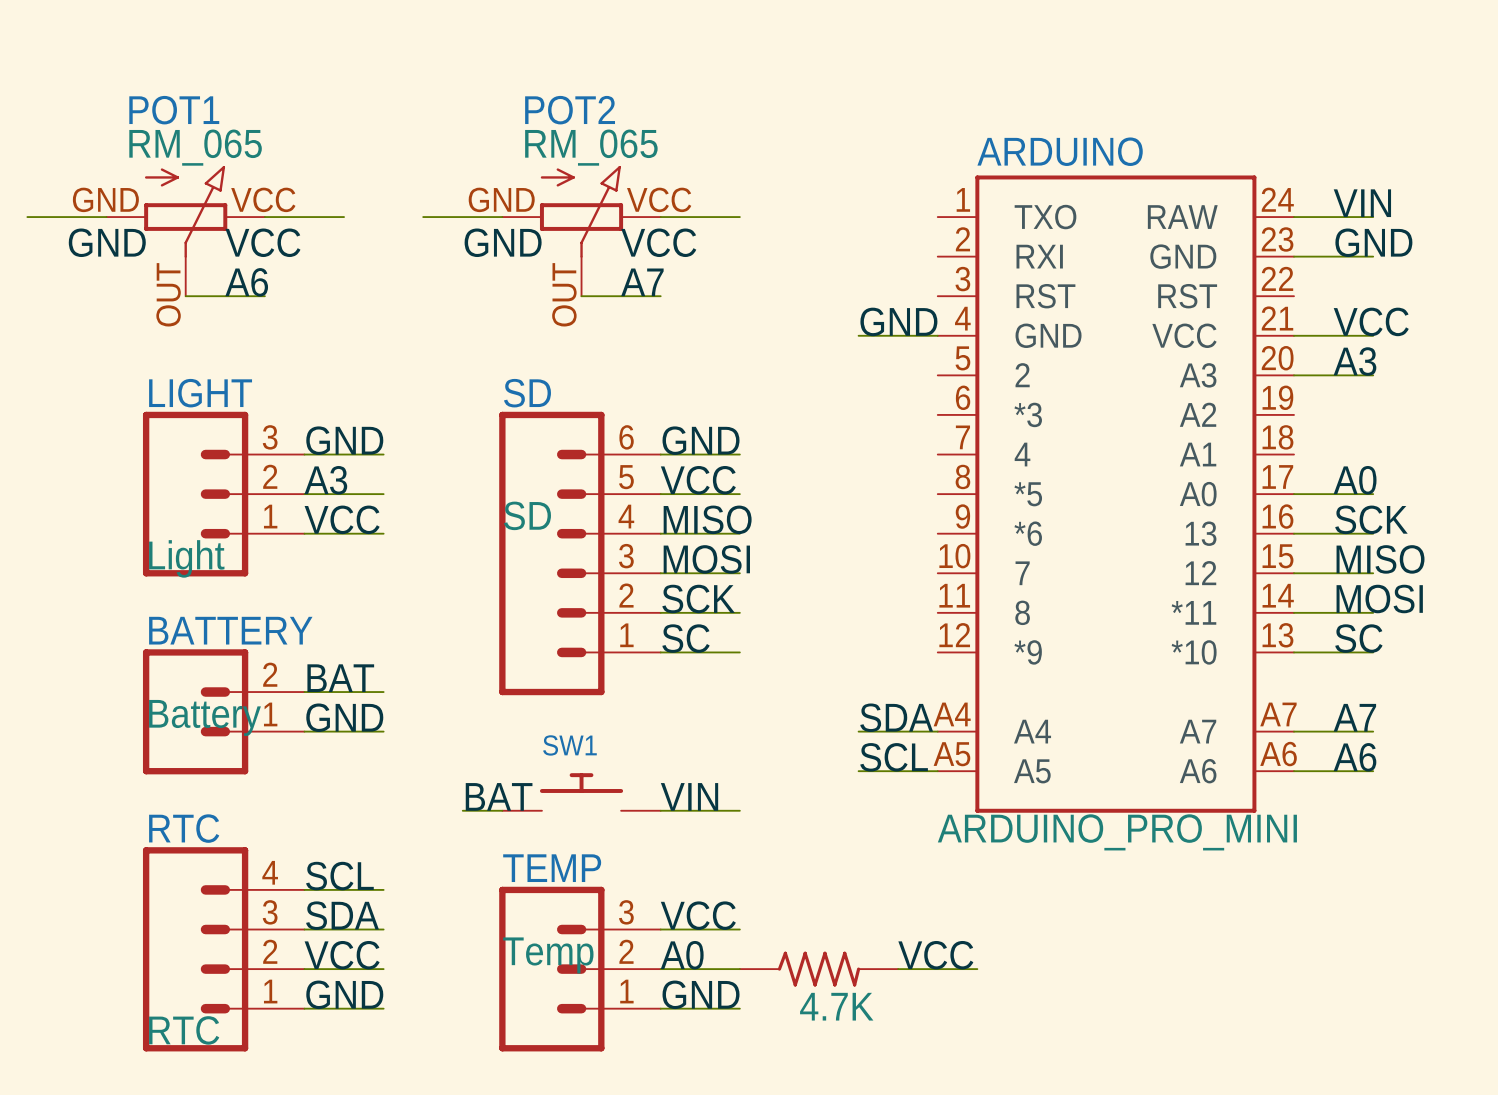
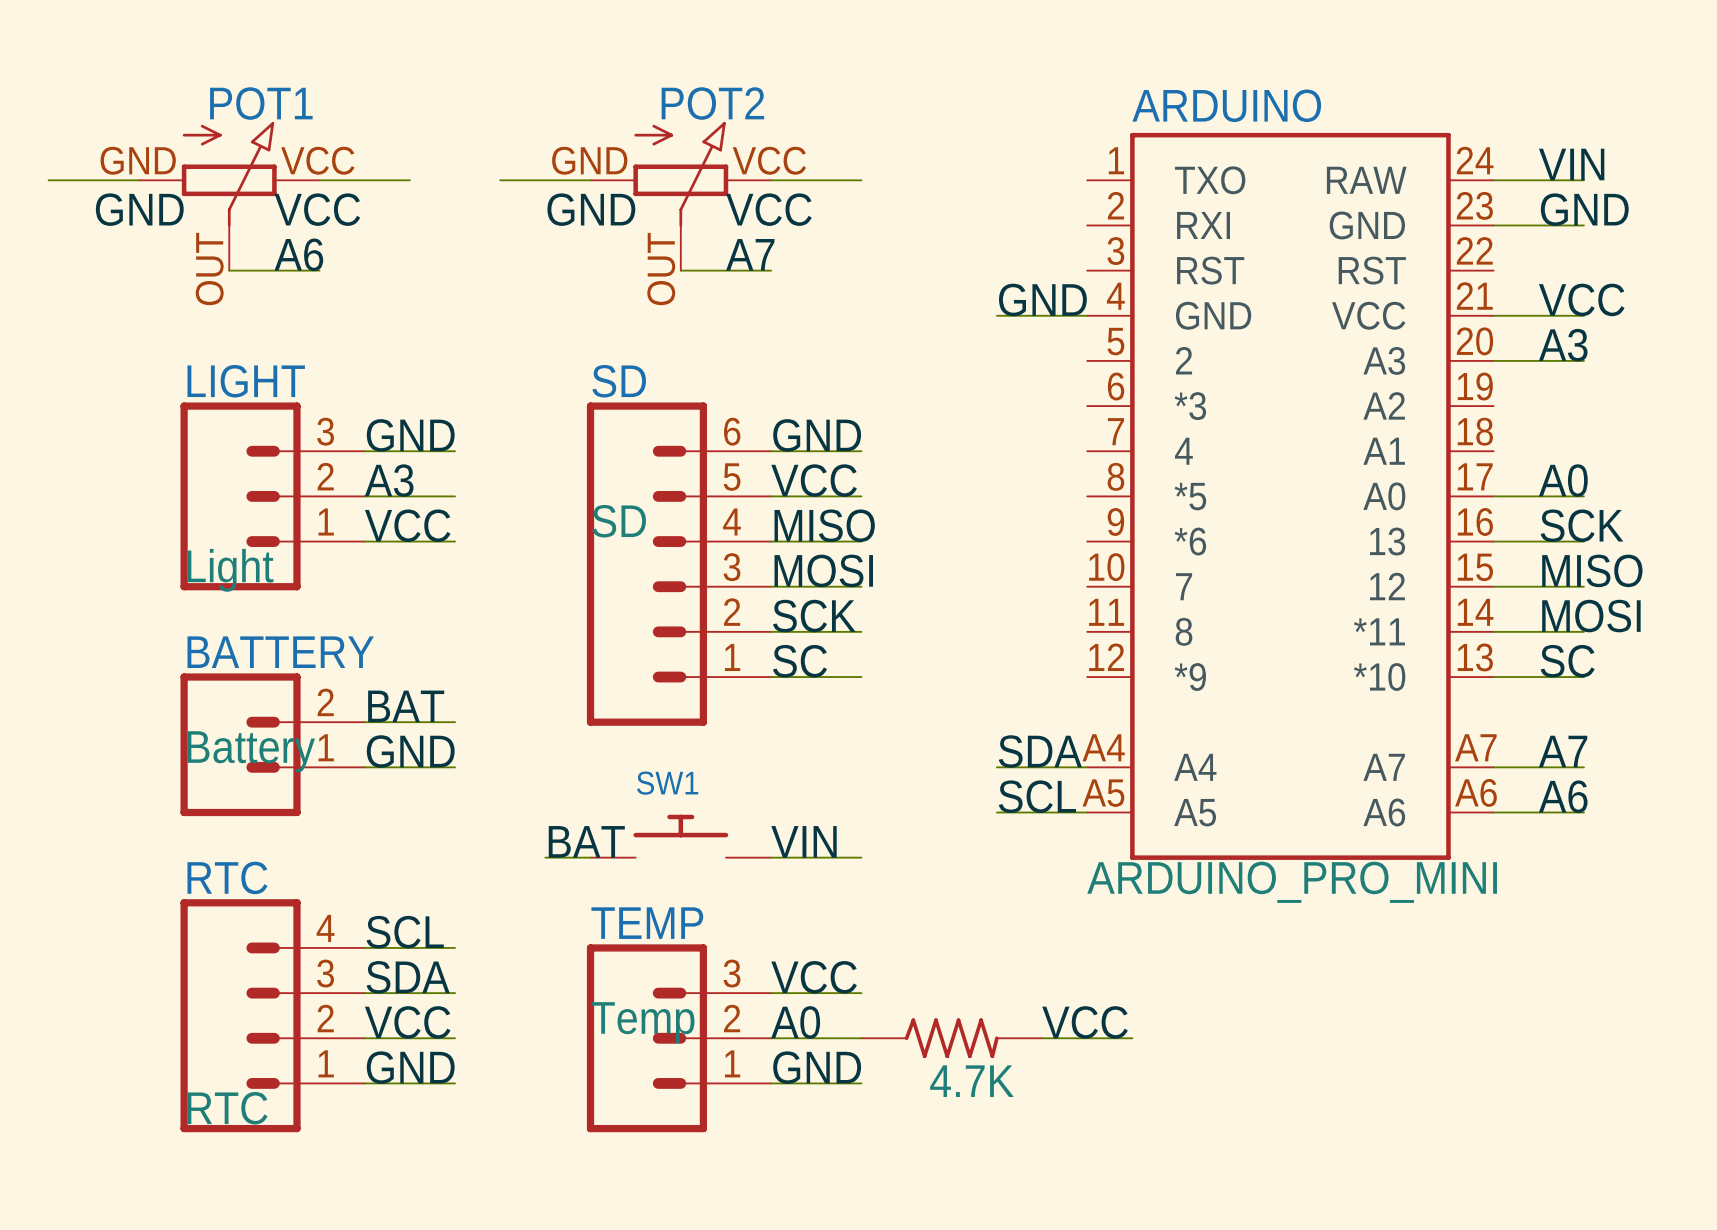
POT1 name position: POT1 (174, 110) -> POT1 (261, 103)
POT2 name position: POT2 (570, 110) -> POT2 (712, 103)
POT1 value: RM_065 (195, 147) -> none
POT2 value: RM_065 (591, 147) -> none

